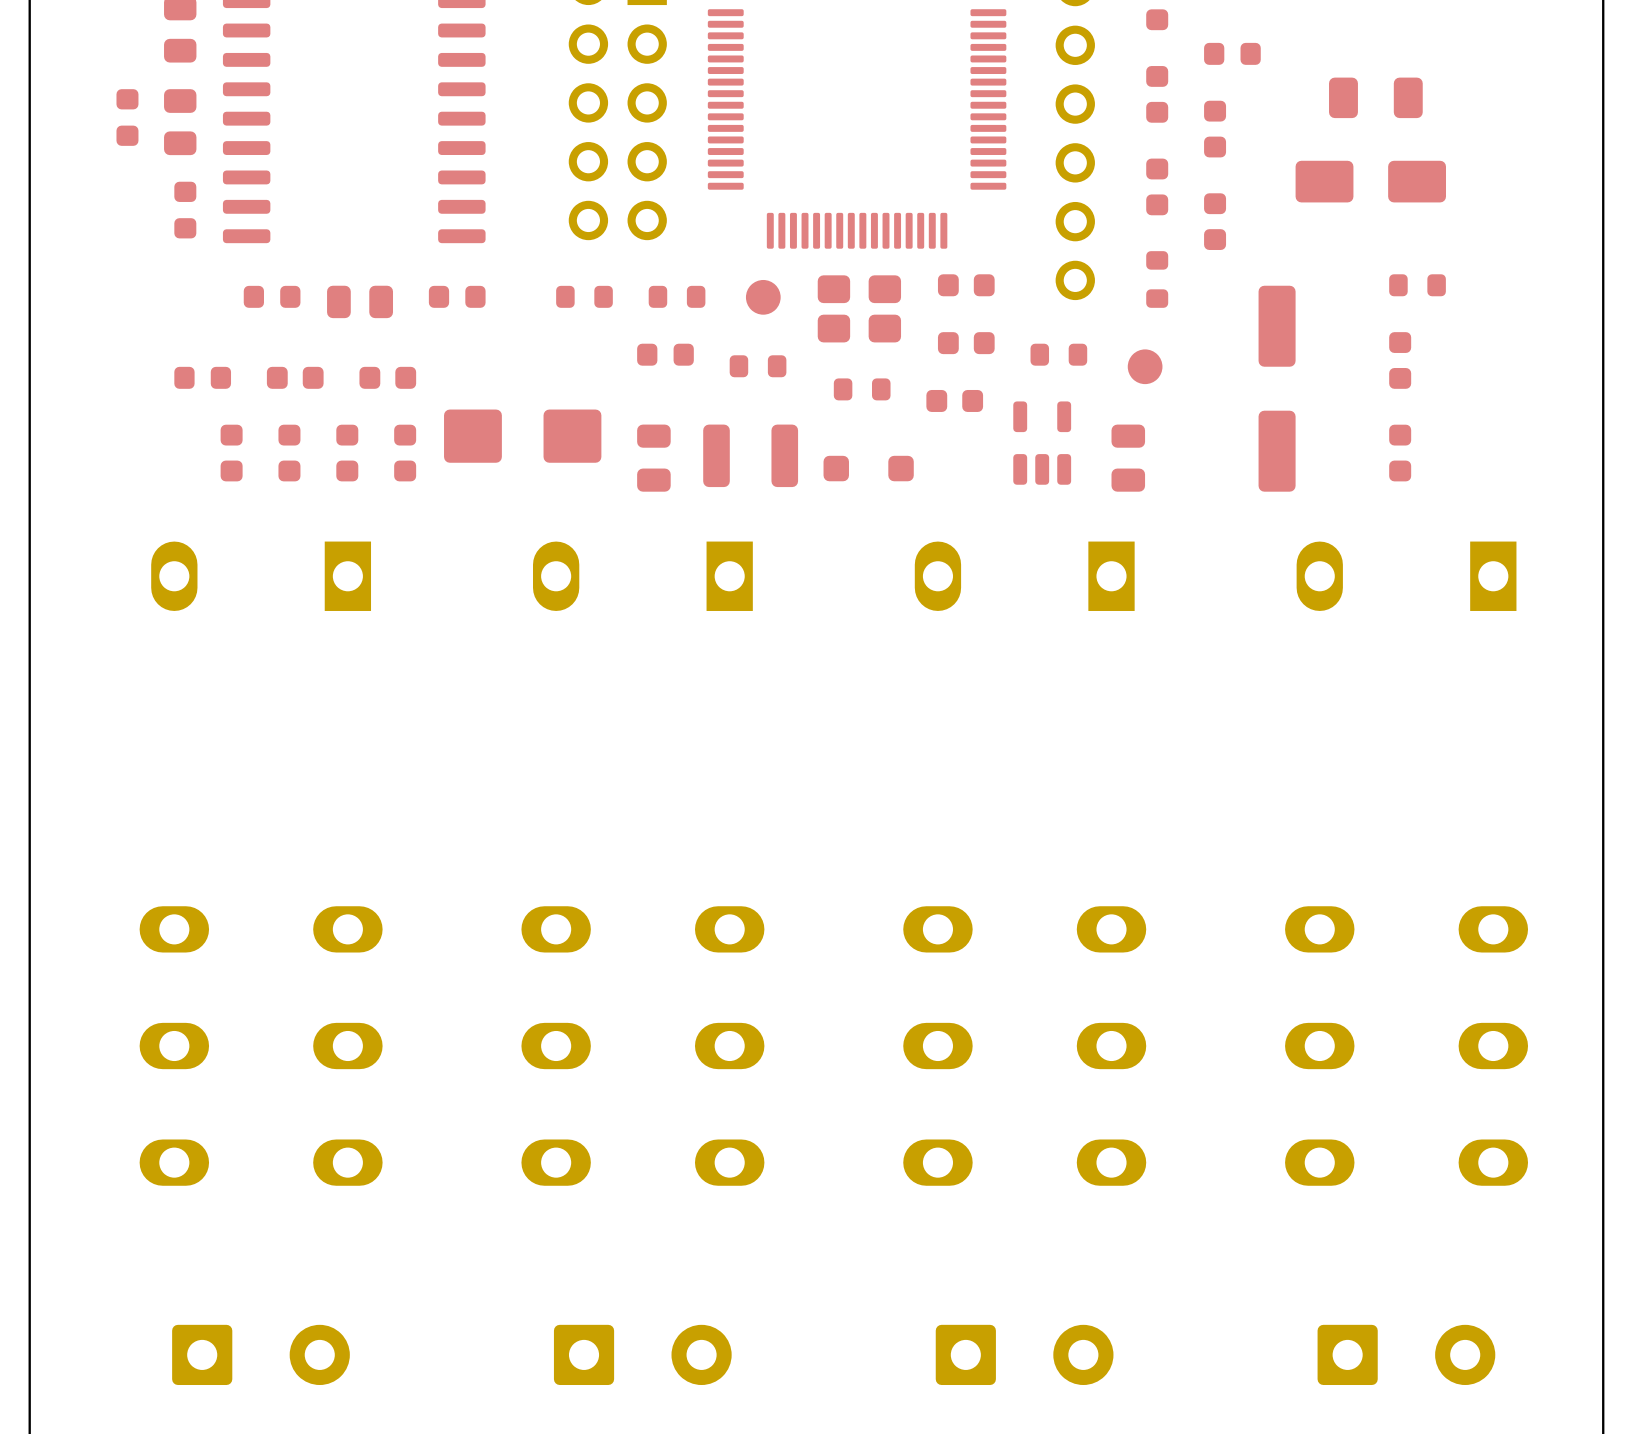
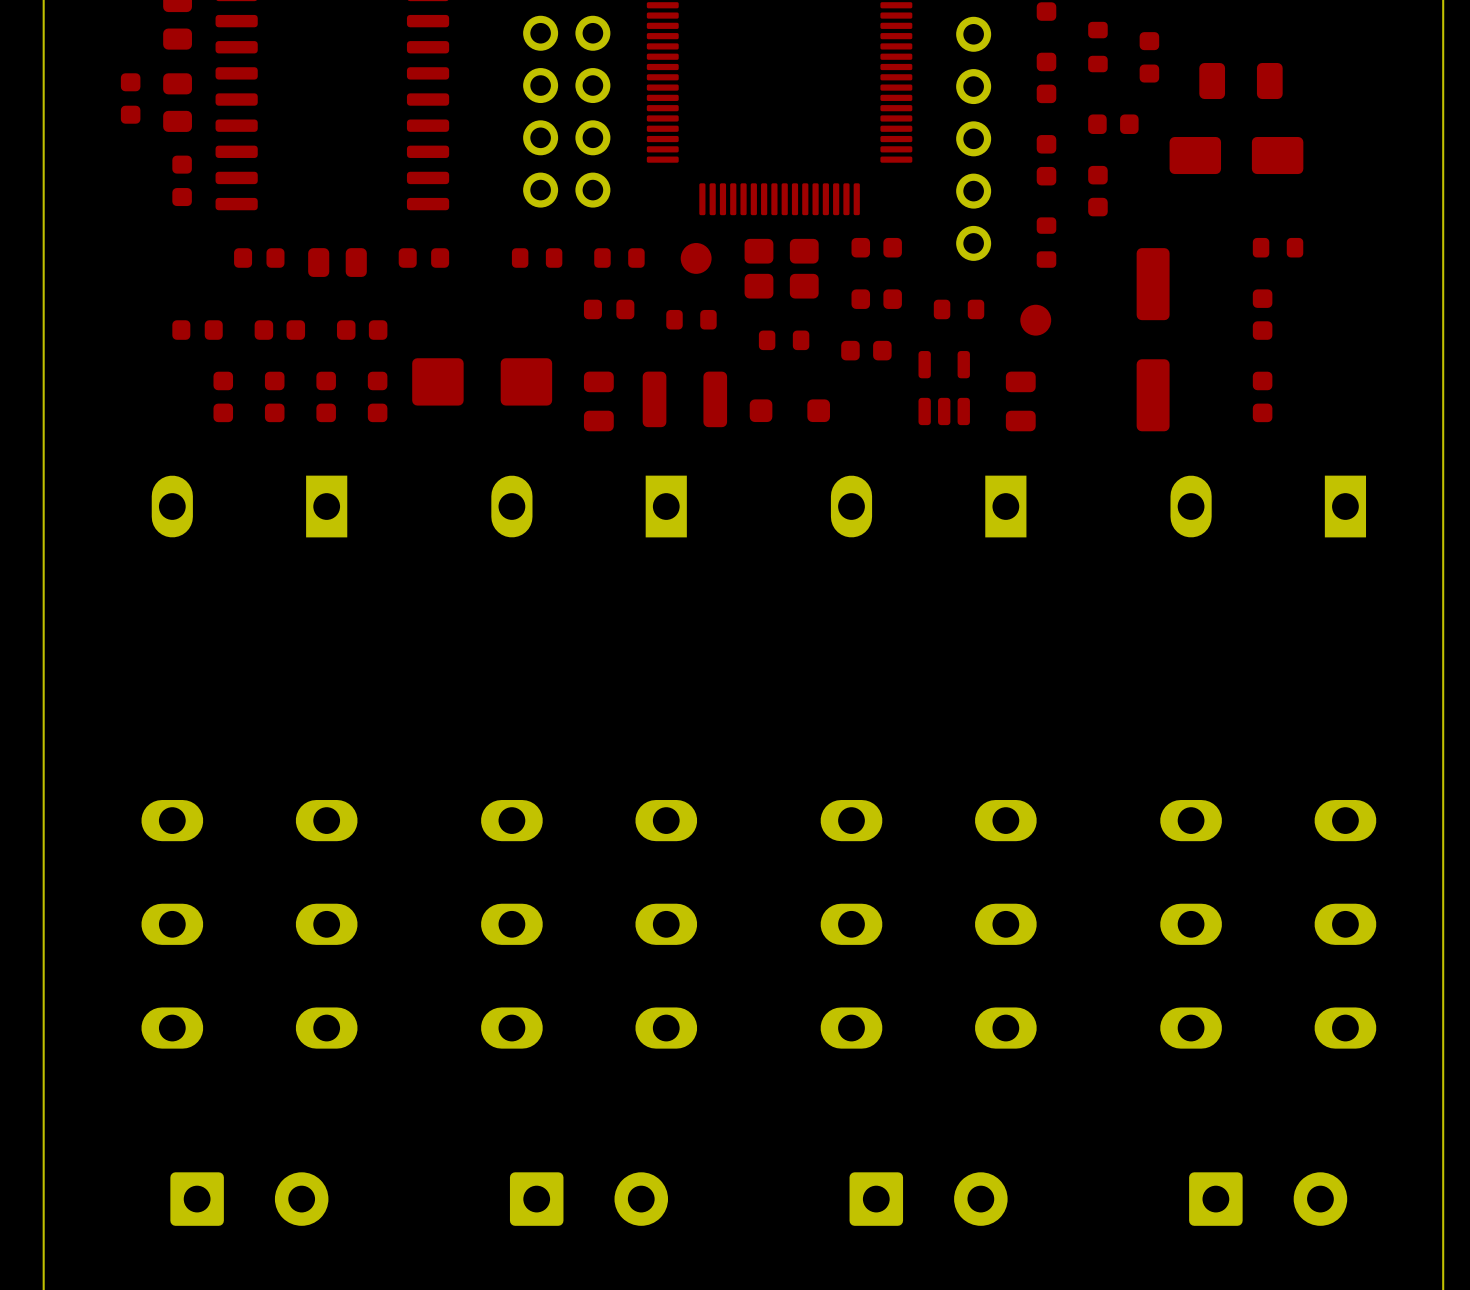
part footprint: [1204, 42, 1261, 65] -> [1088, 21, 1108, 73]
part: none -> (1149, 57)
part rotation: 0° (1215, 129) -> 90° clockwise (1113, 124)

